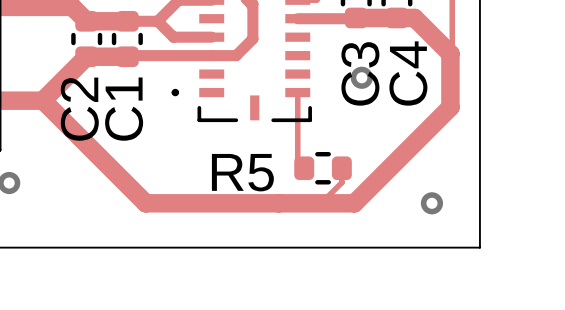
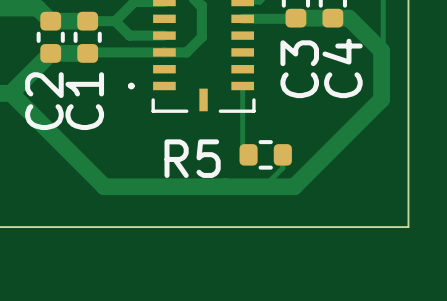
via: (361, 77) -> none
via: (431, 203) -> none

